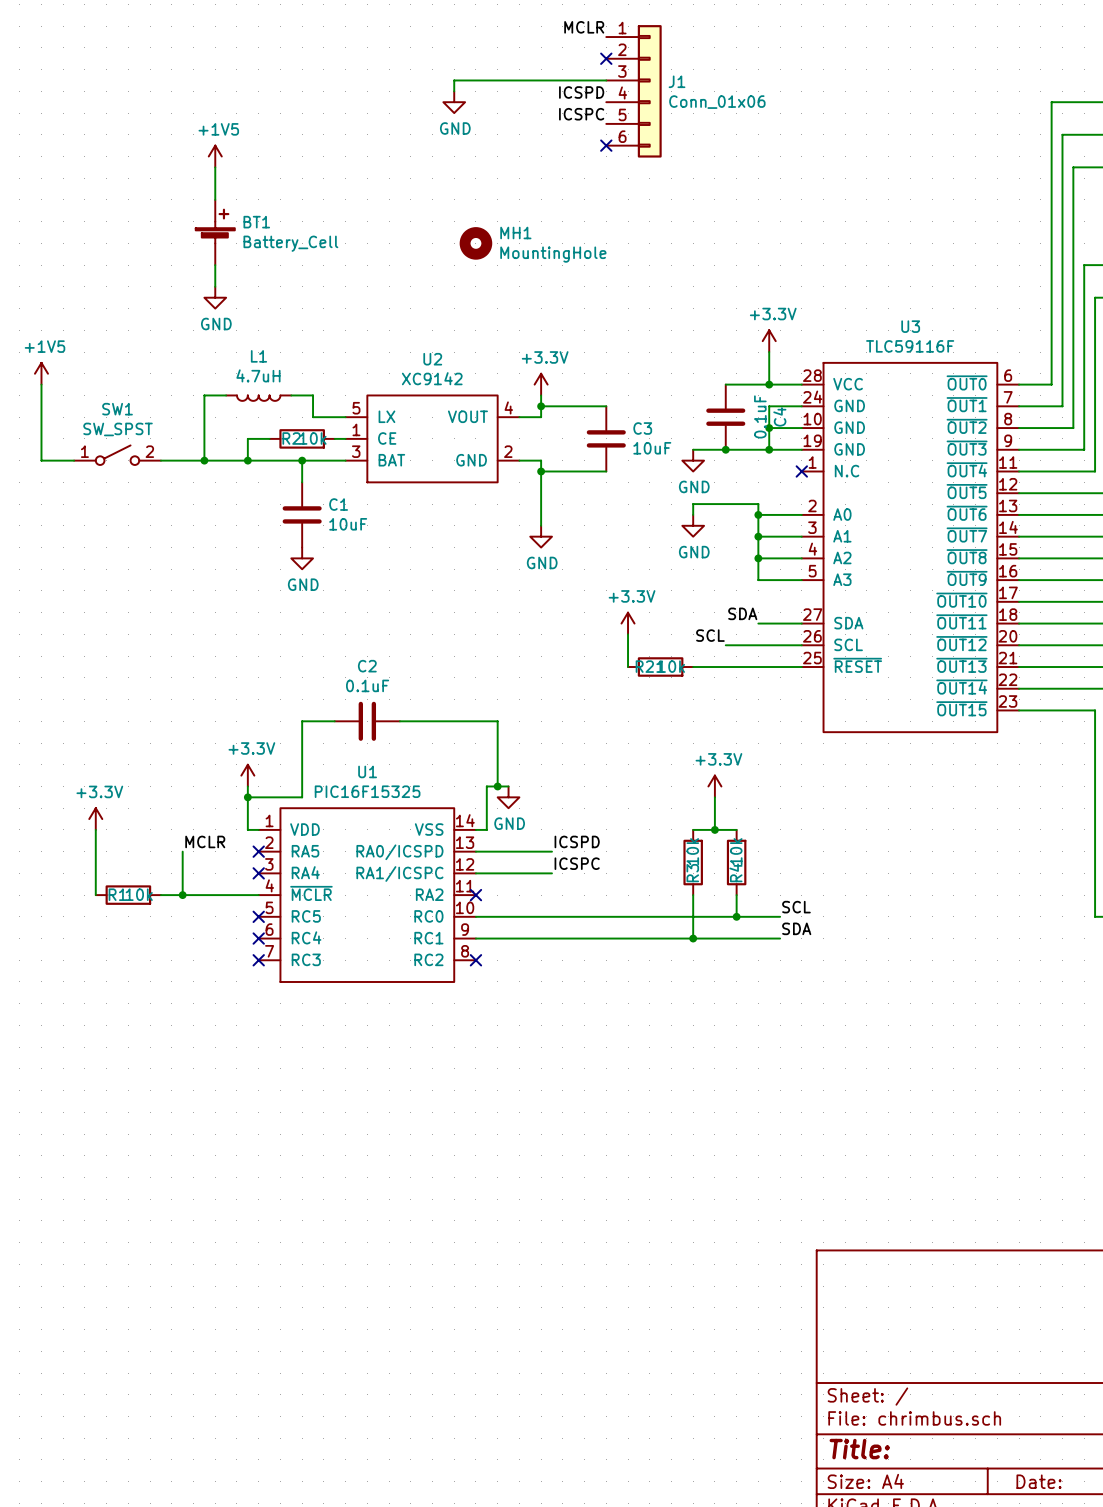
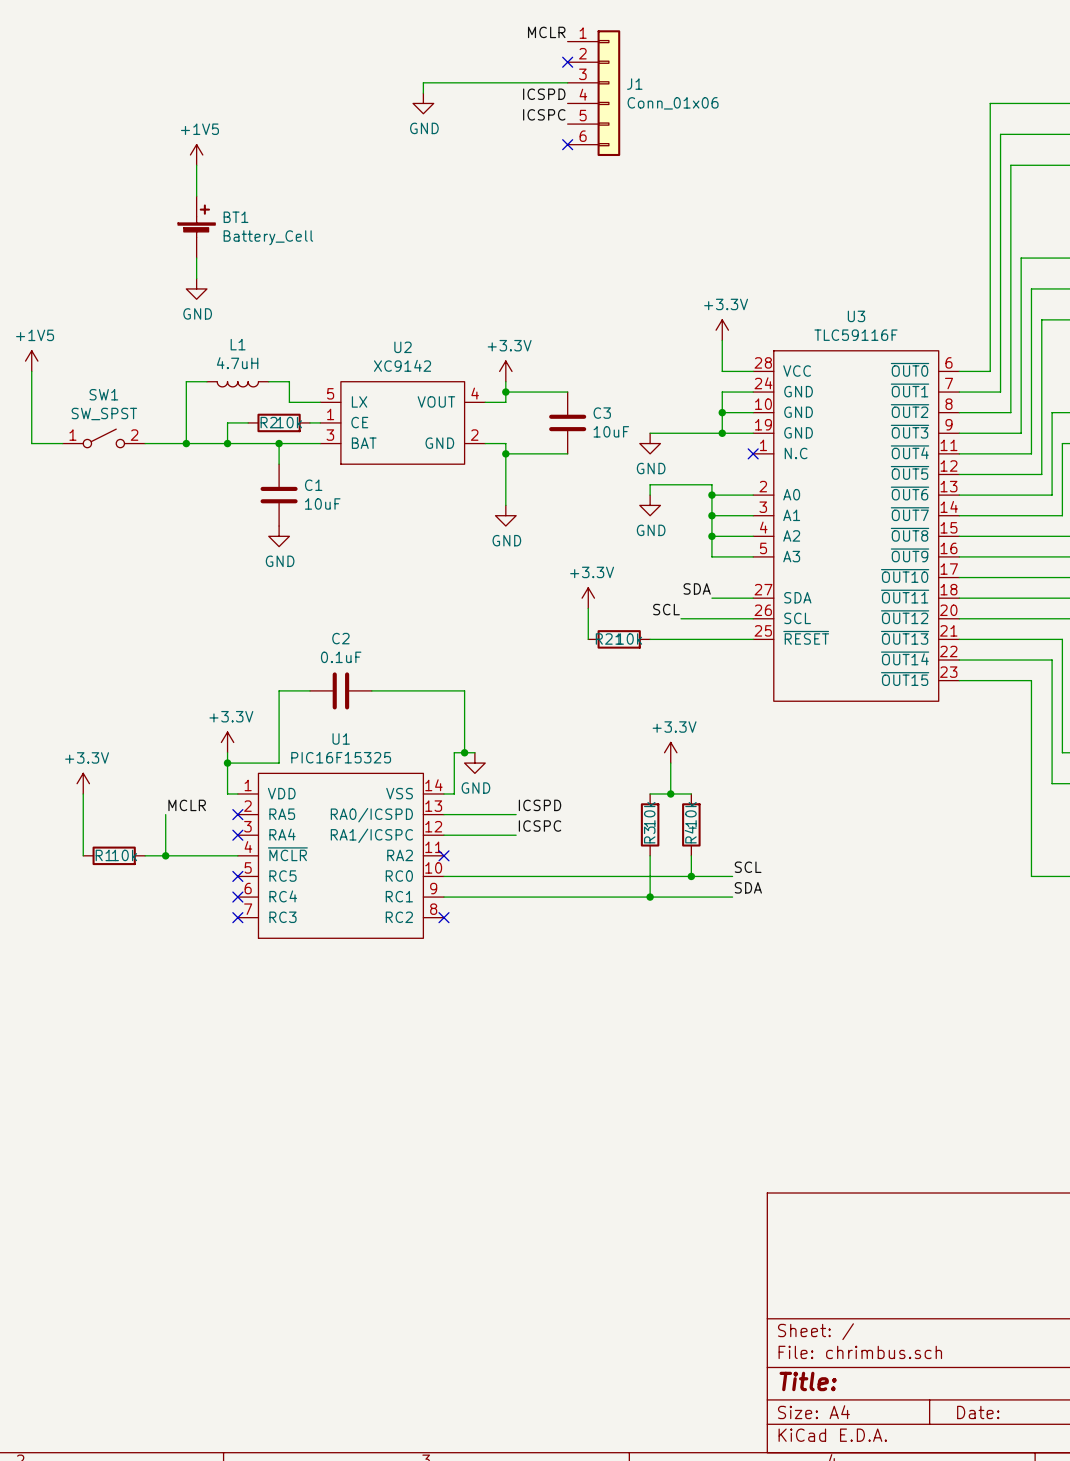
MH1: MountingHole (475, 243) -> none
wire: (725, 384) (769, 384) -> none
junction: (769, 384) -> none
C4: 0.1uF (725, 417) -> none
junction: (725, 449) -> none

